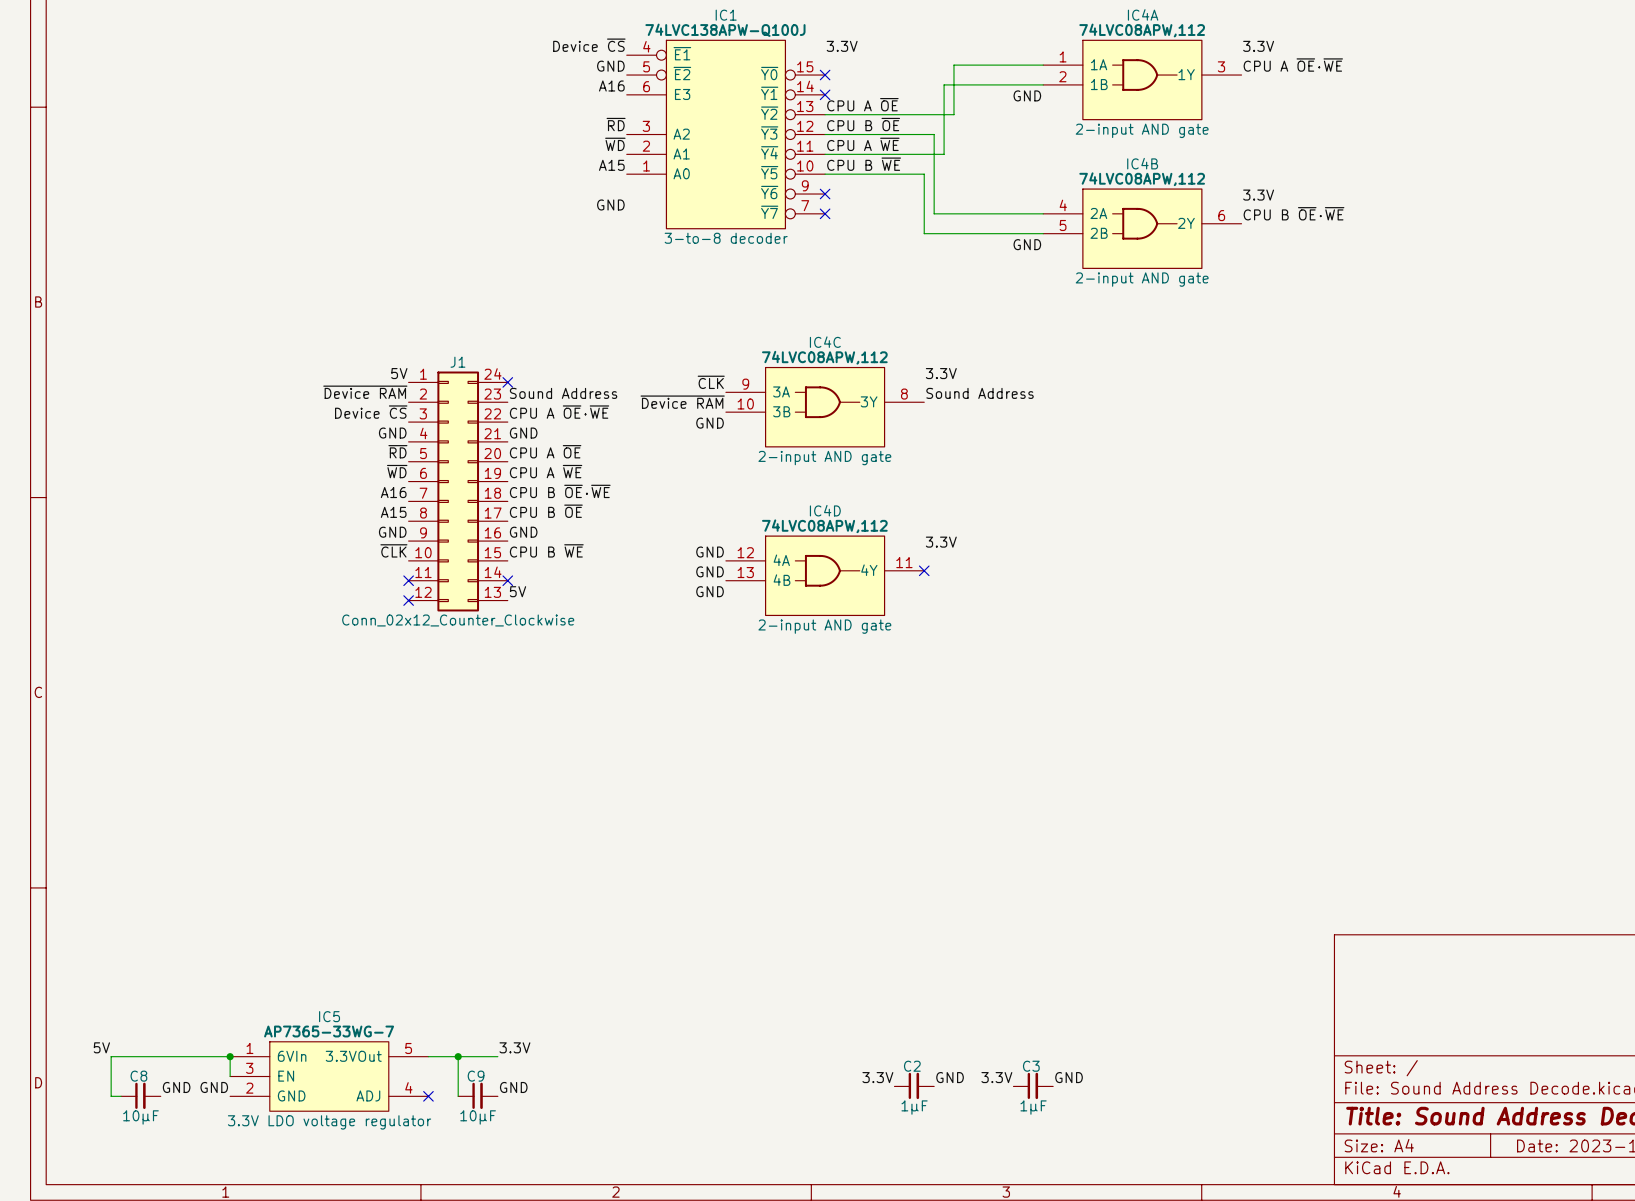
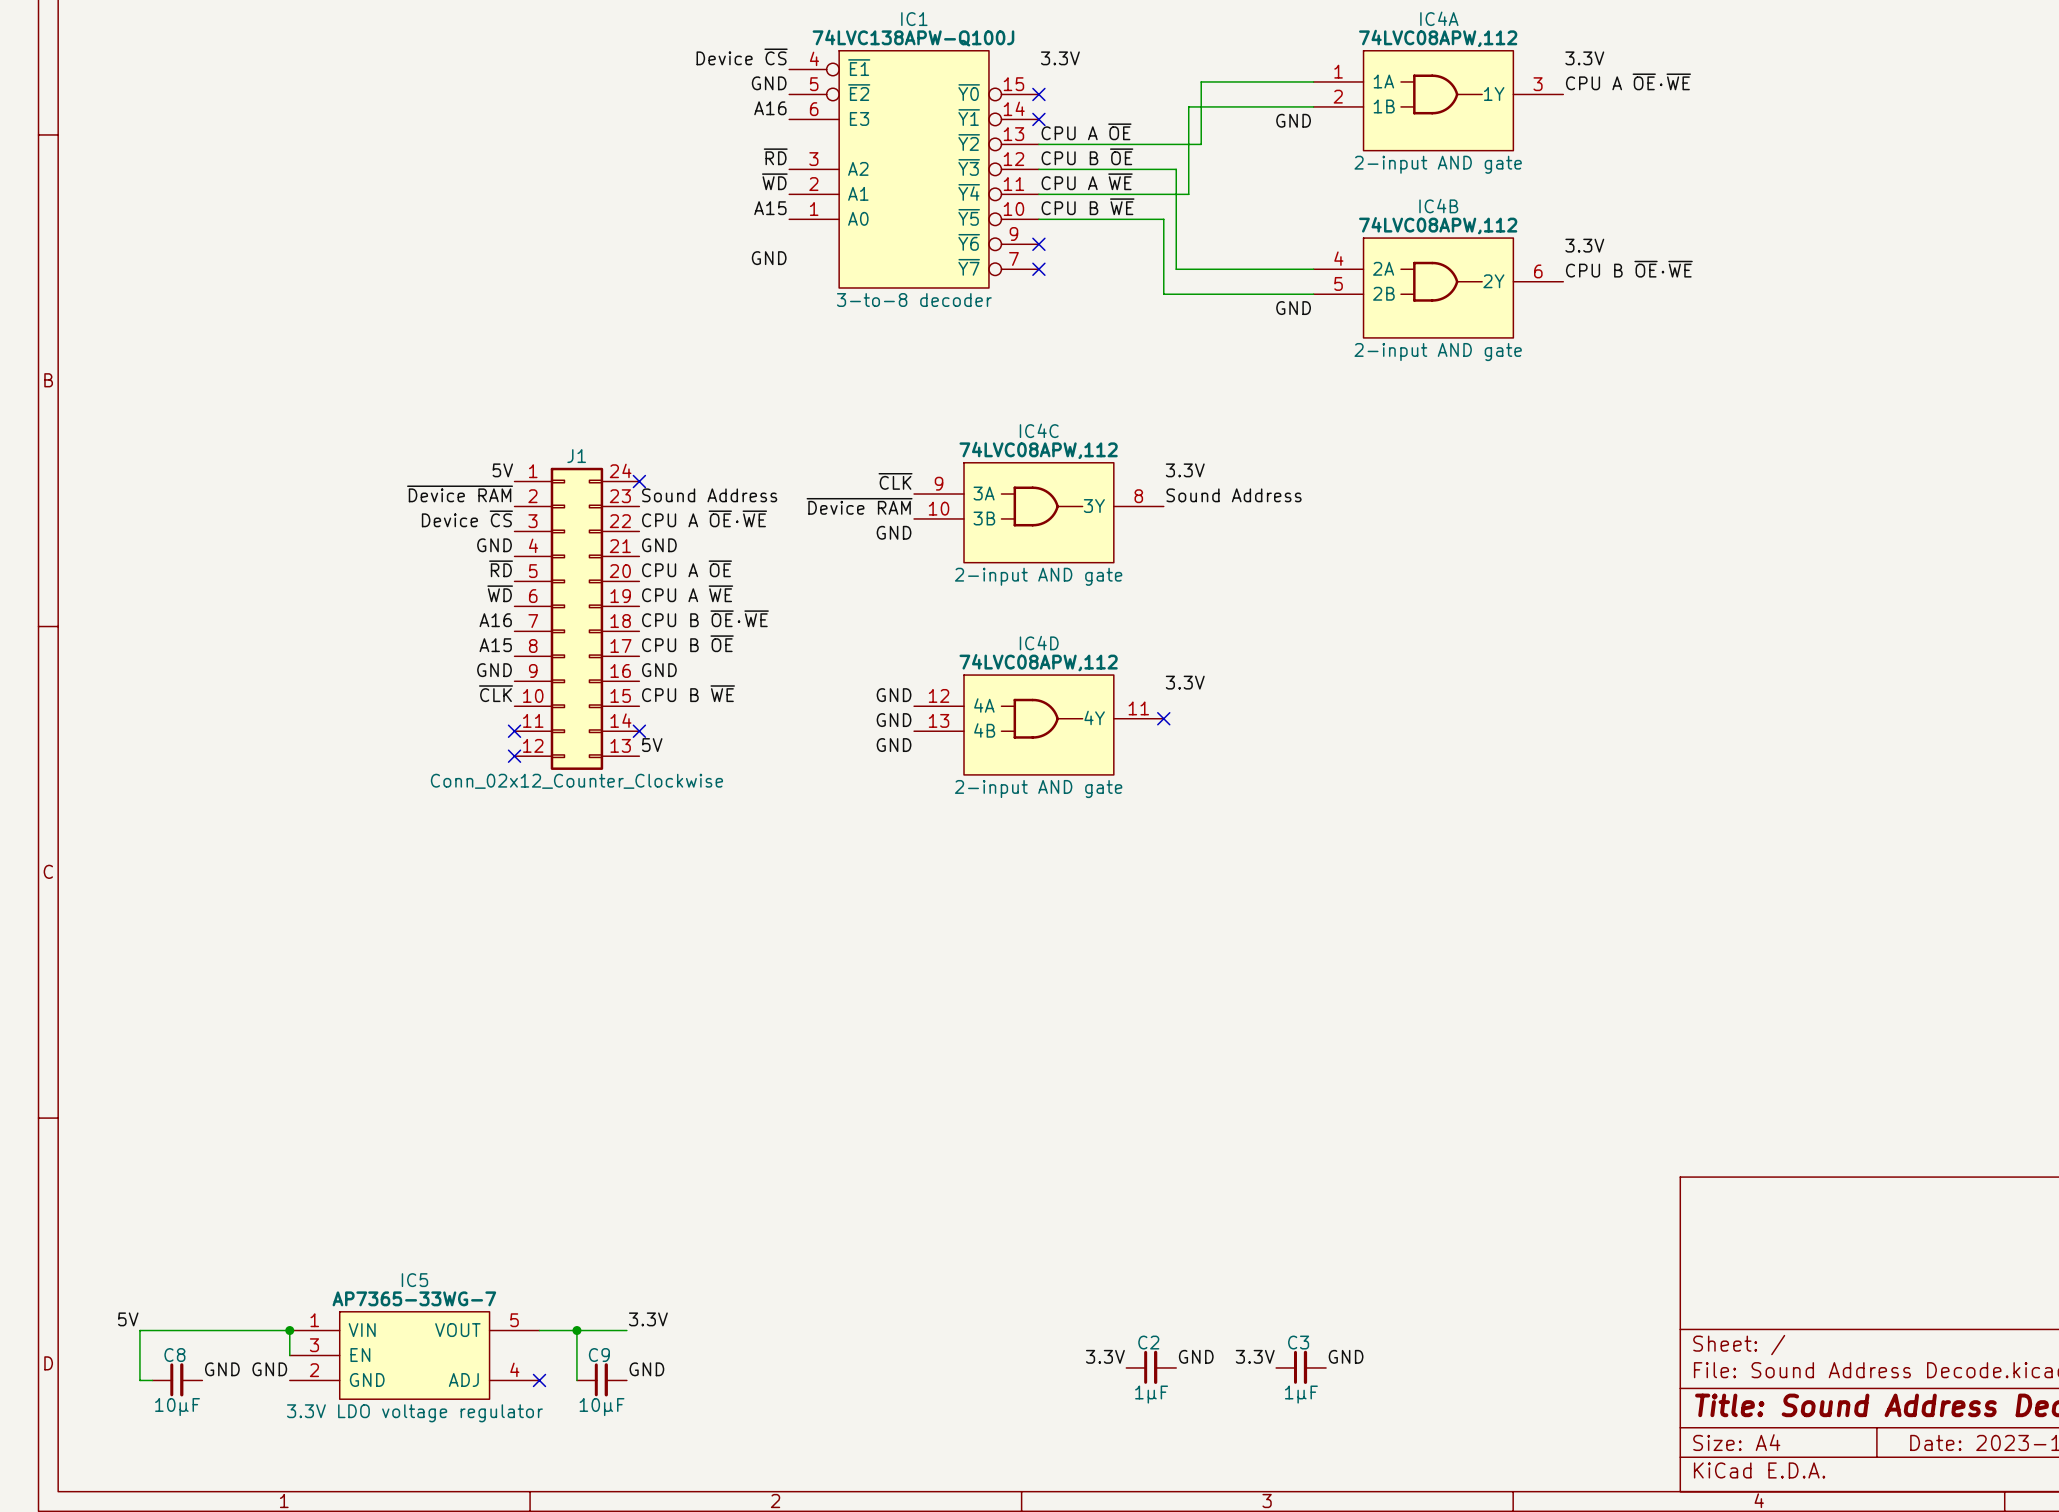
IC5 pin name: 6VIn (292, 1056) -> VIN (362, 1330)
IC5 pin name: 3.3VOut (353, 1056) -> VOUT (457, 1330)

